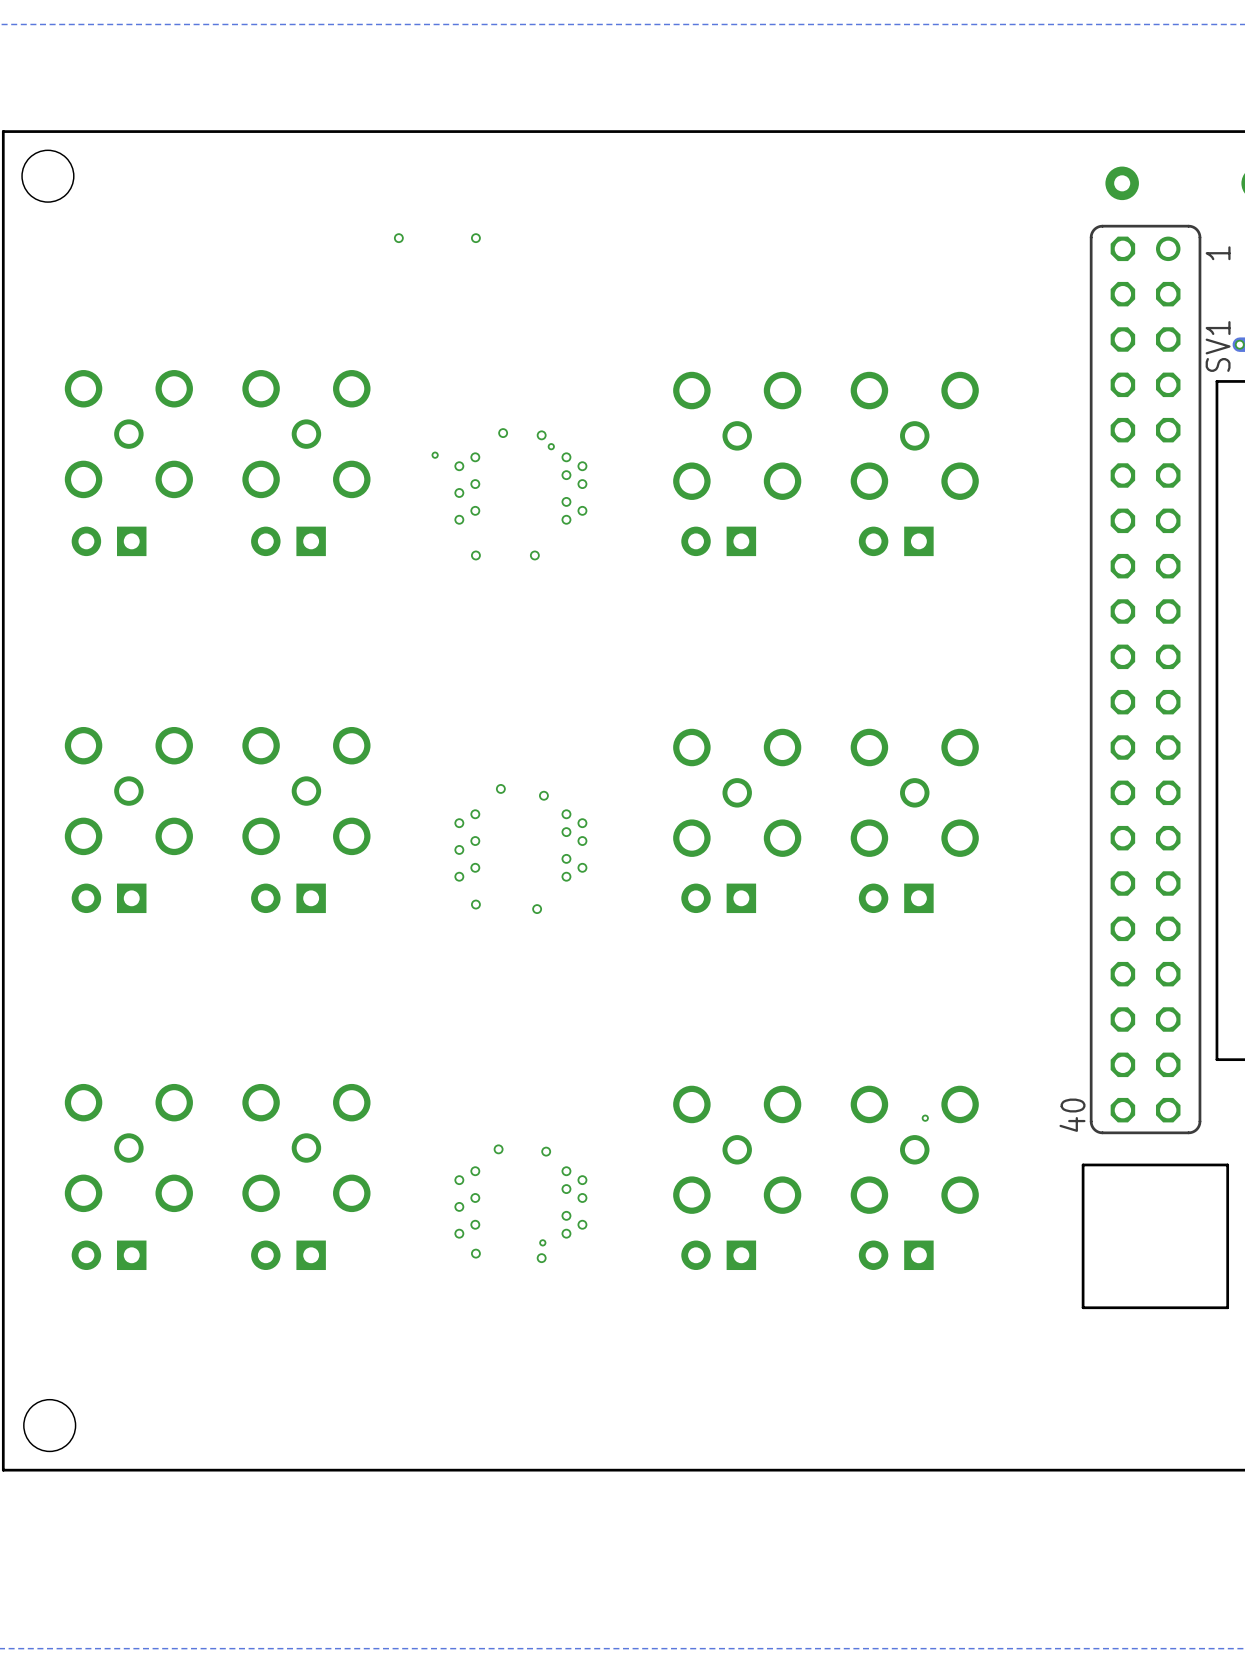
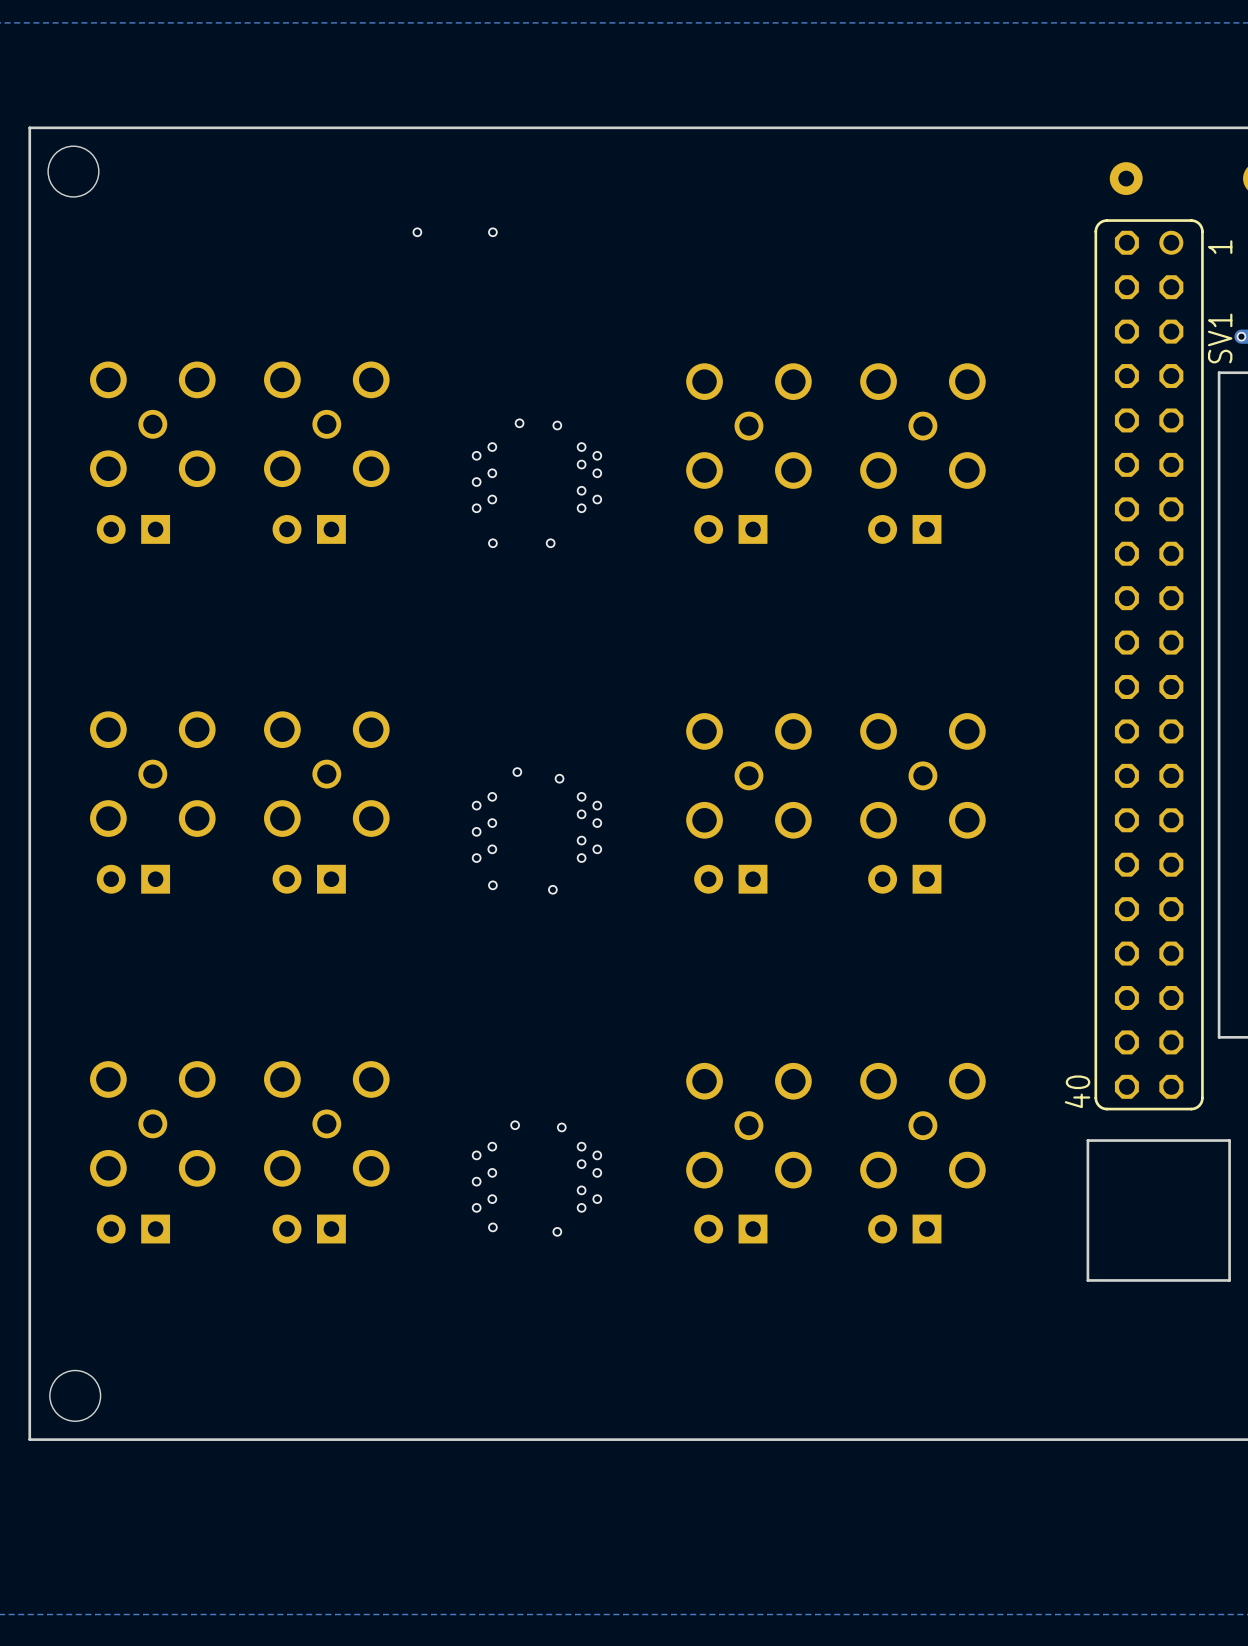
via: (551, 446) -> none
via: (435, 455) -> none
via: (925, 1118) -> none
via: (542, 1242) -> none

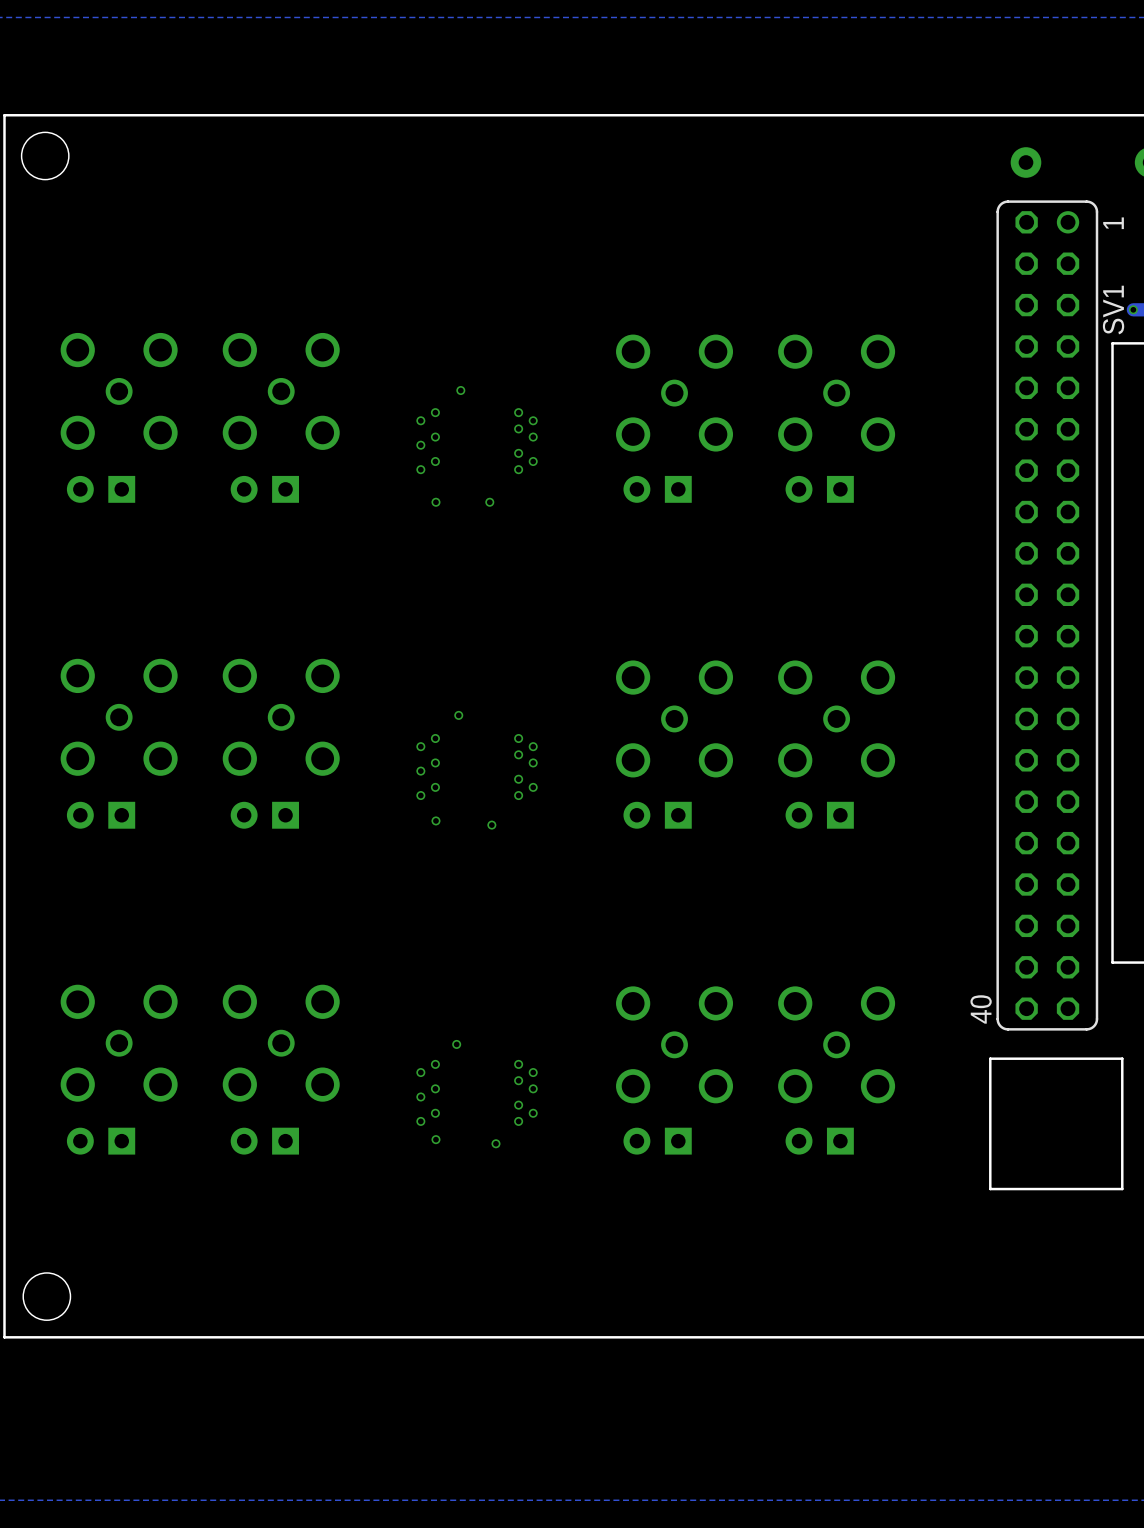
via: (417, 232) -> none
via: (492, 232) -> none
via: (557, 425) -> none
via: (559, 778) -> none
via: (561, 1127) -> none

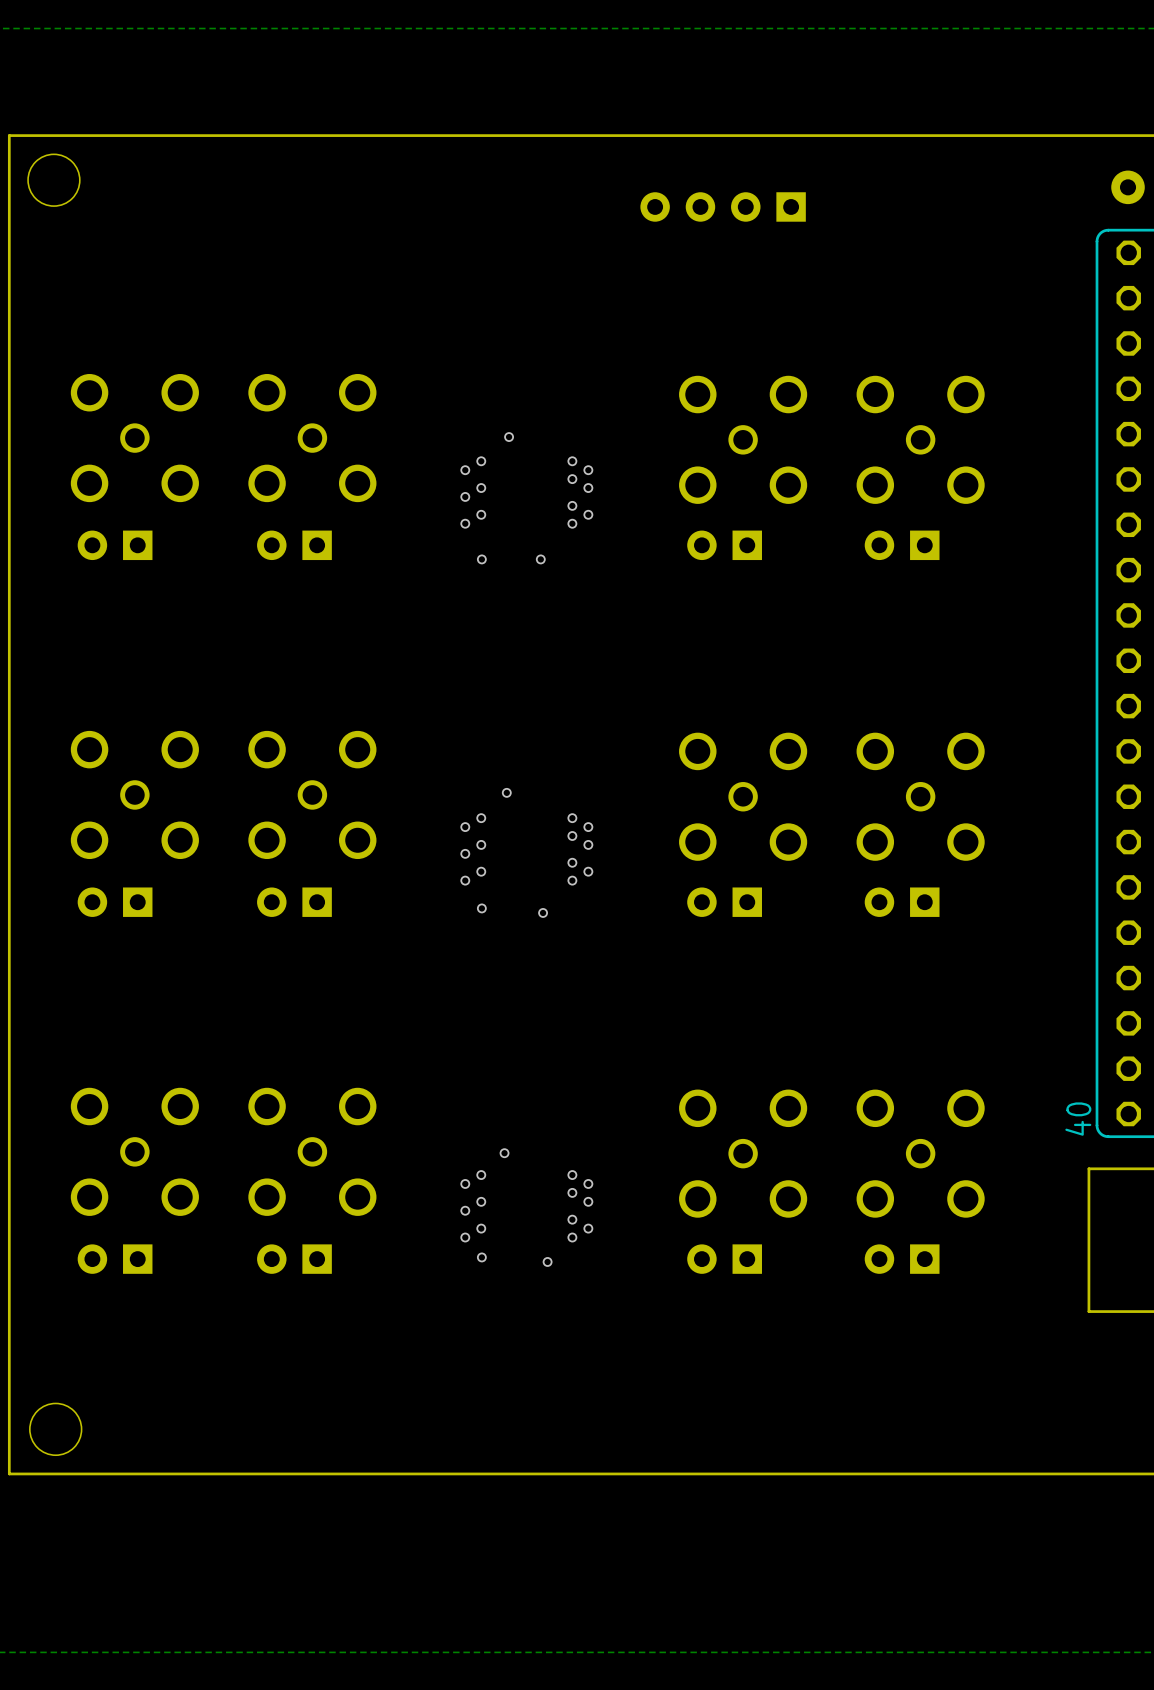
part: none -> (723, 206)

